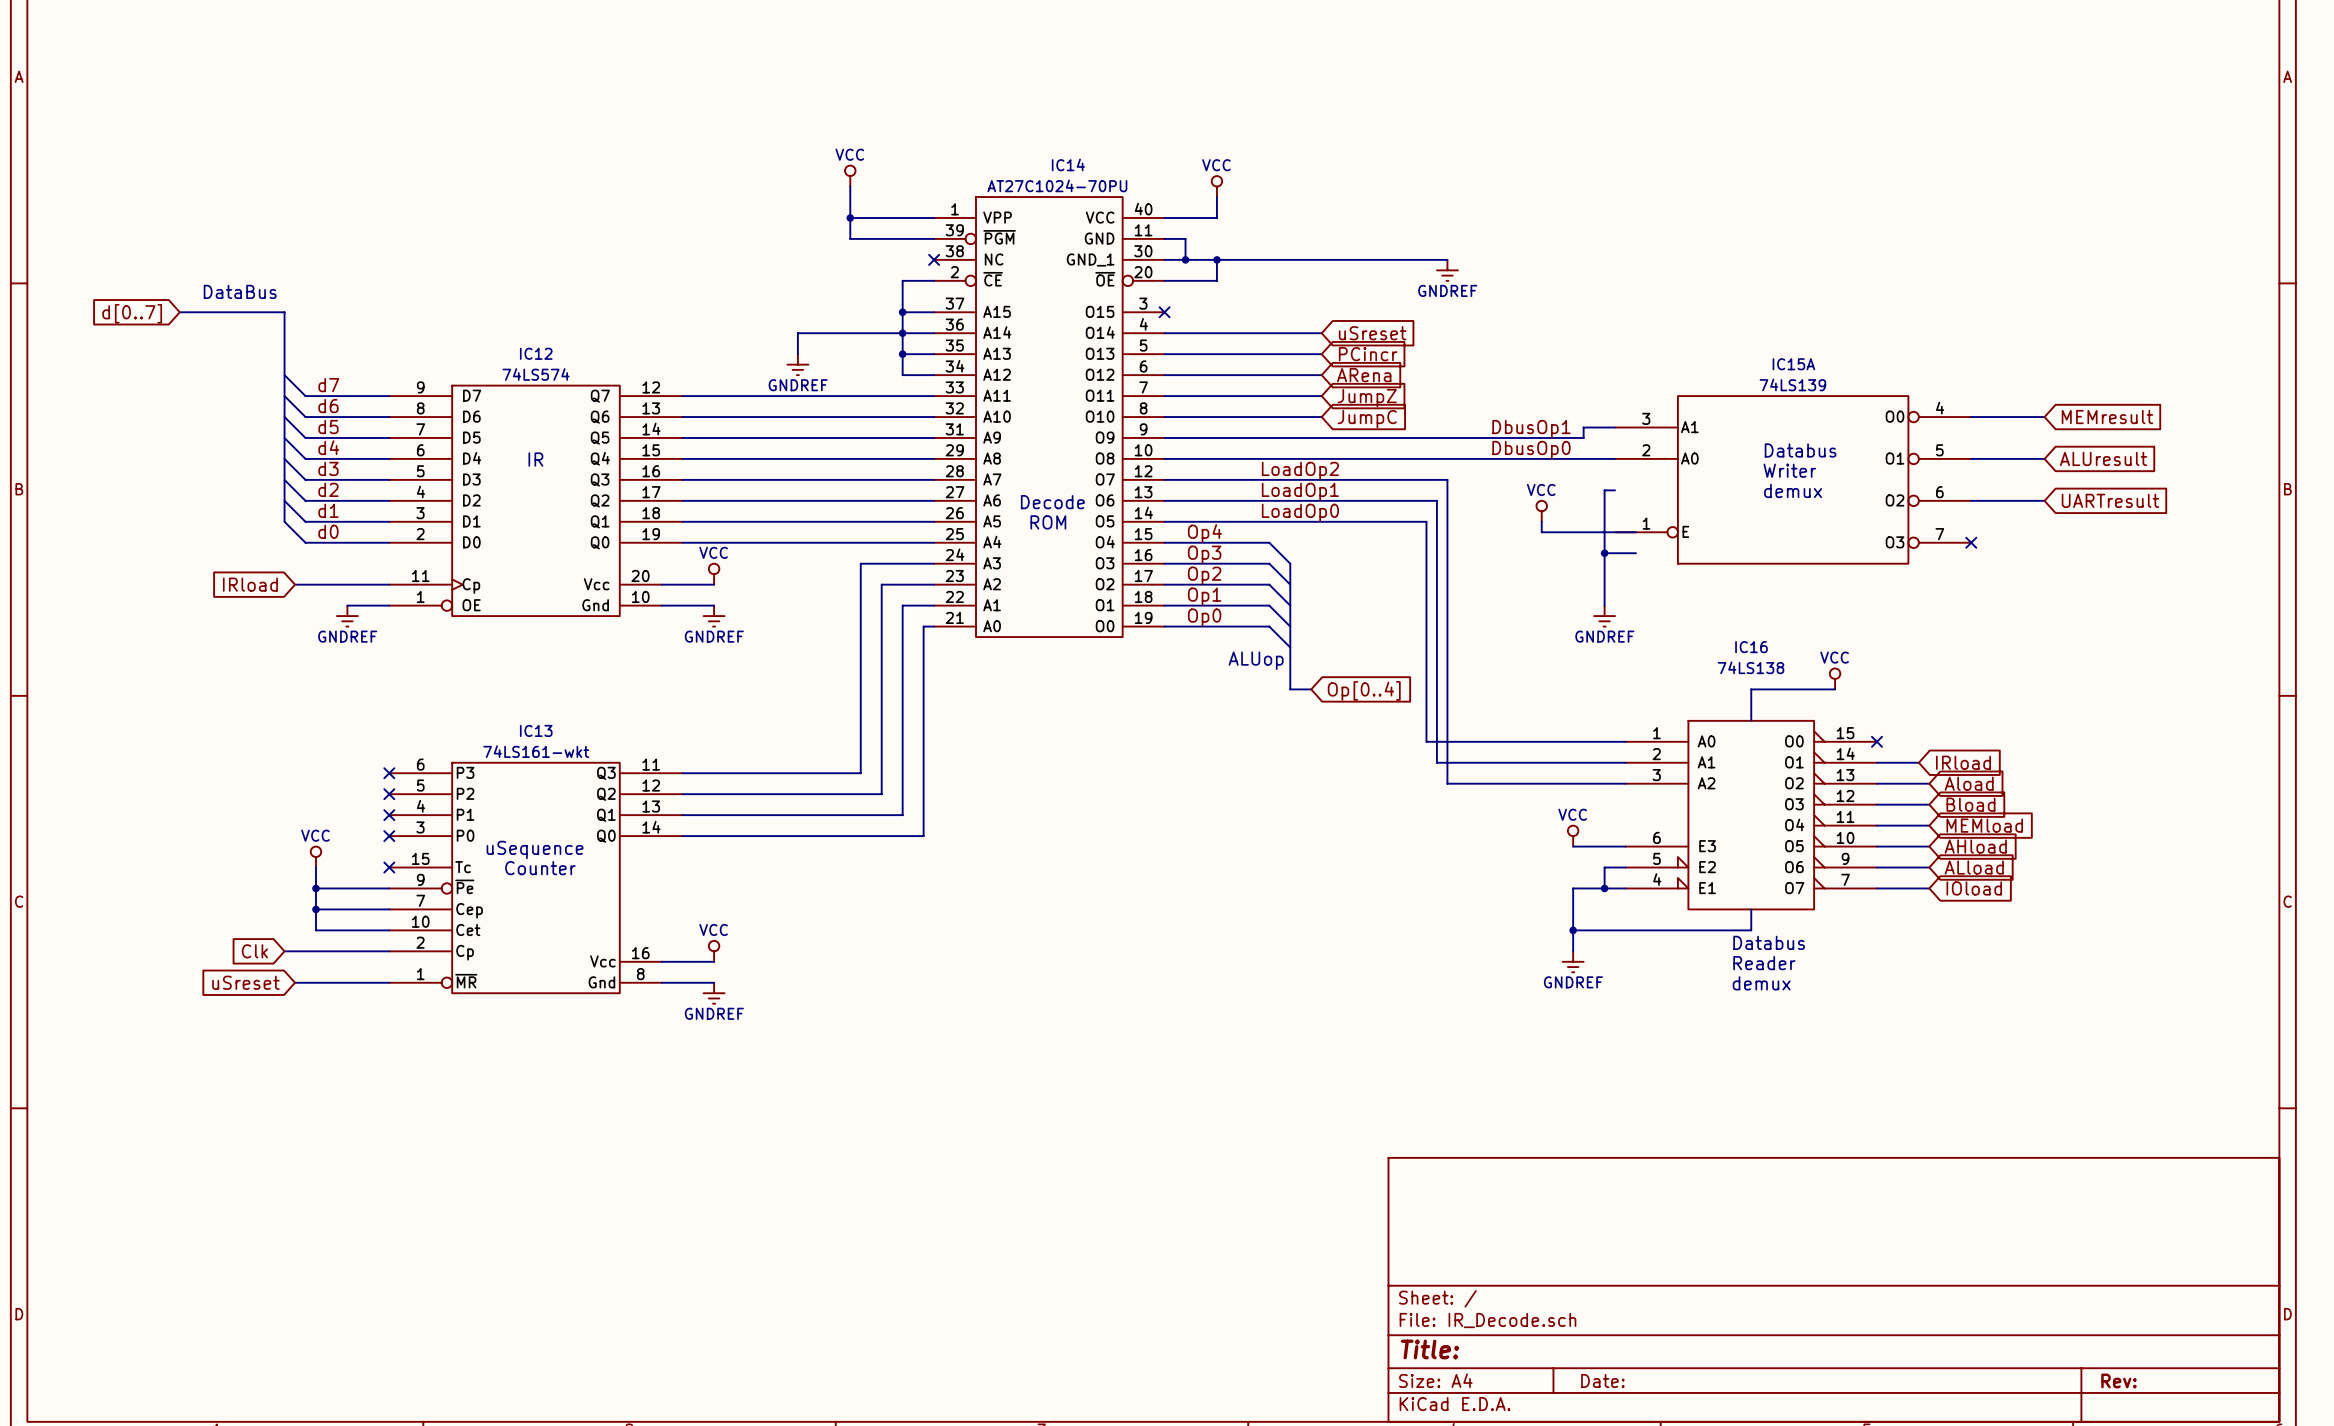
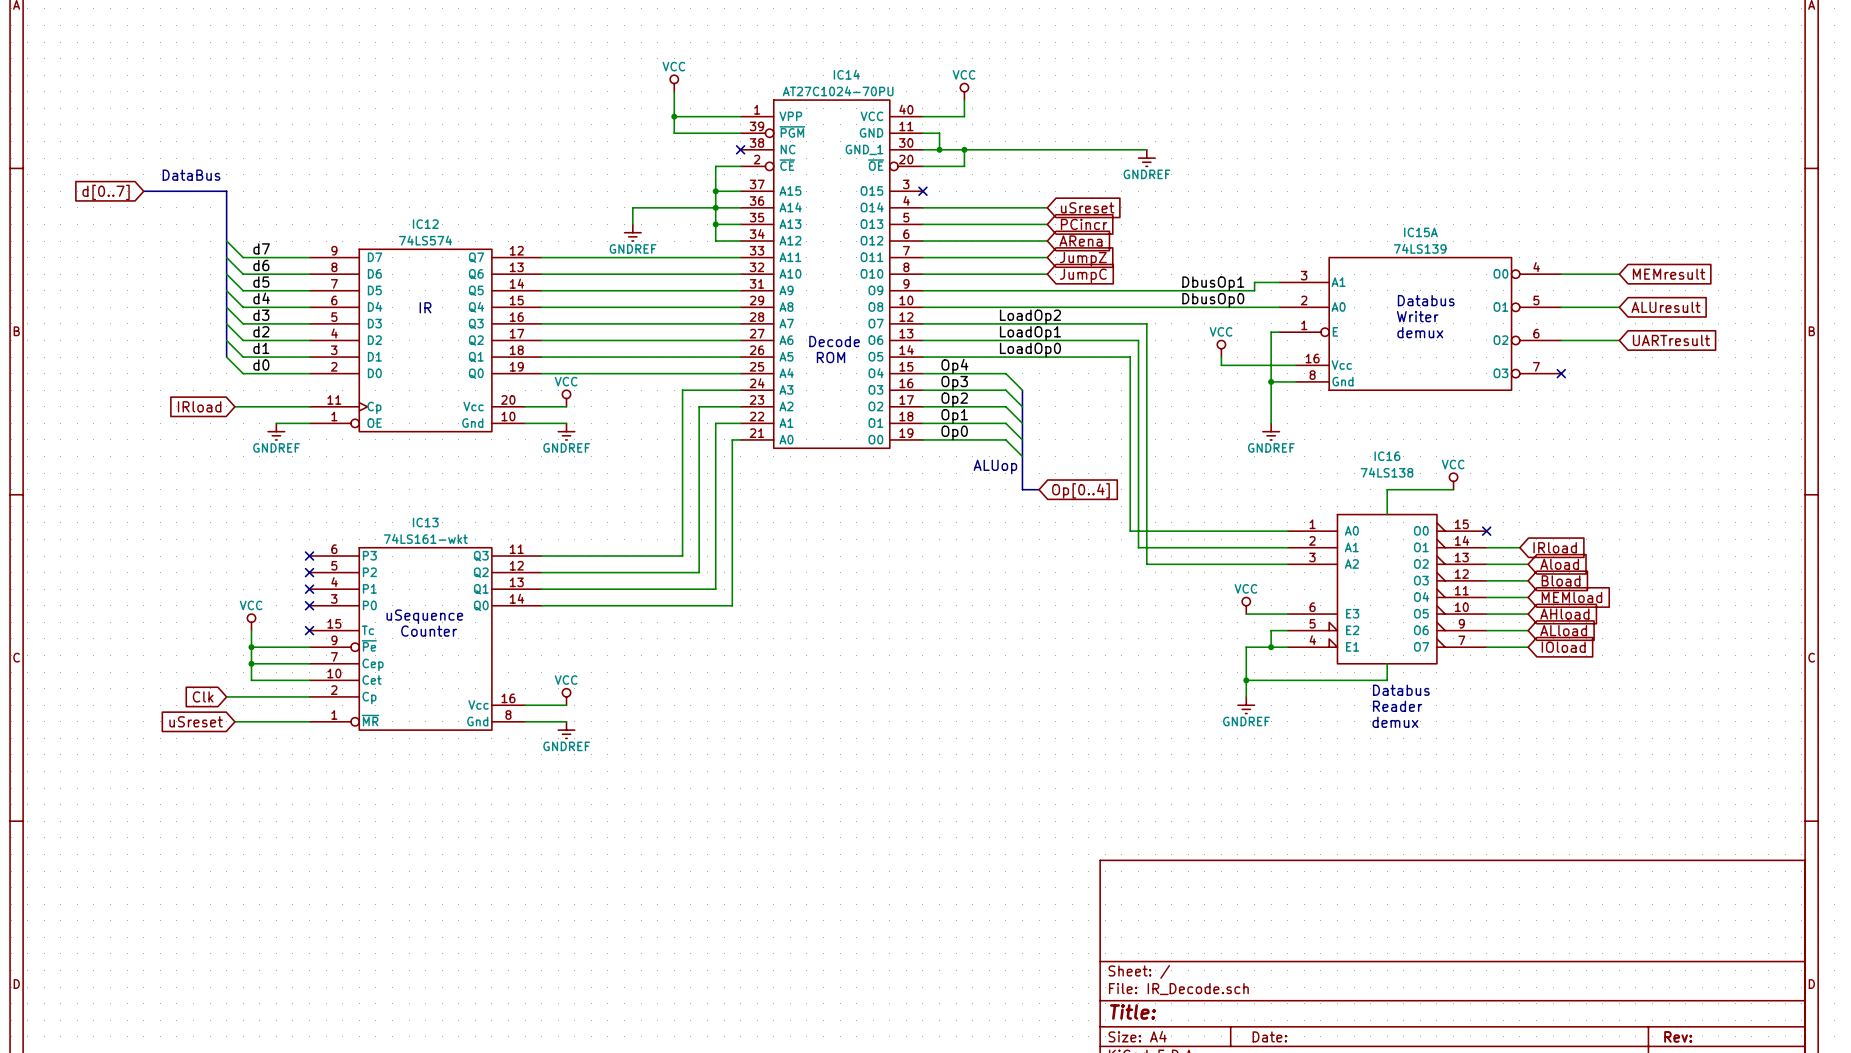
IC15A symbol: [1615, 396, 1972, 564] -> [1279, 257, 1562, 391]

